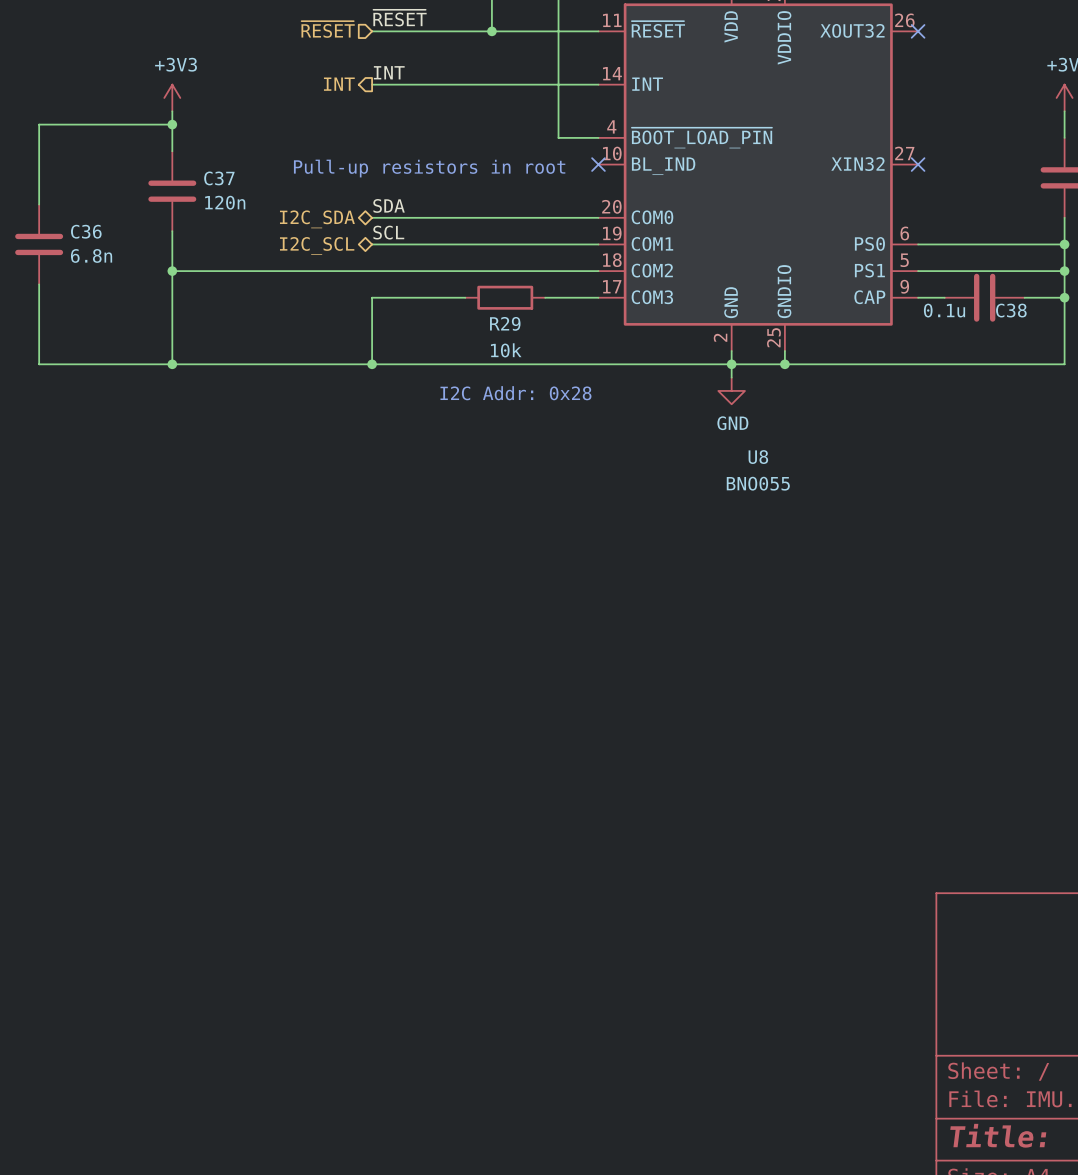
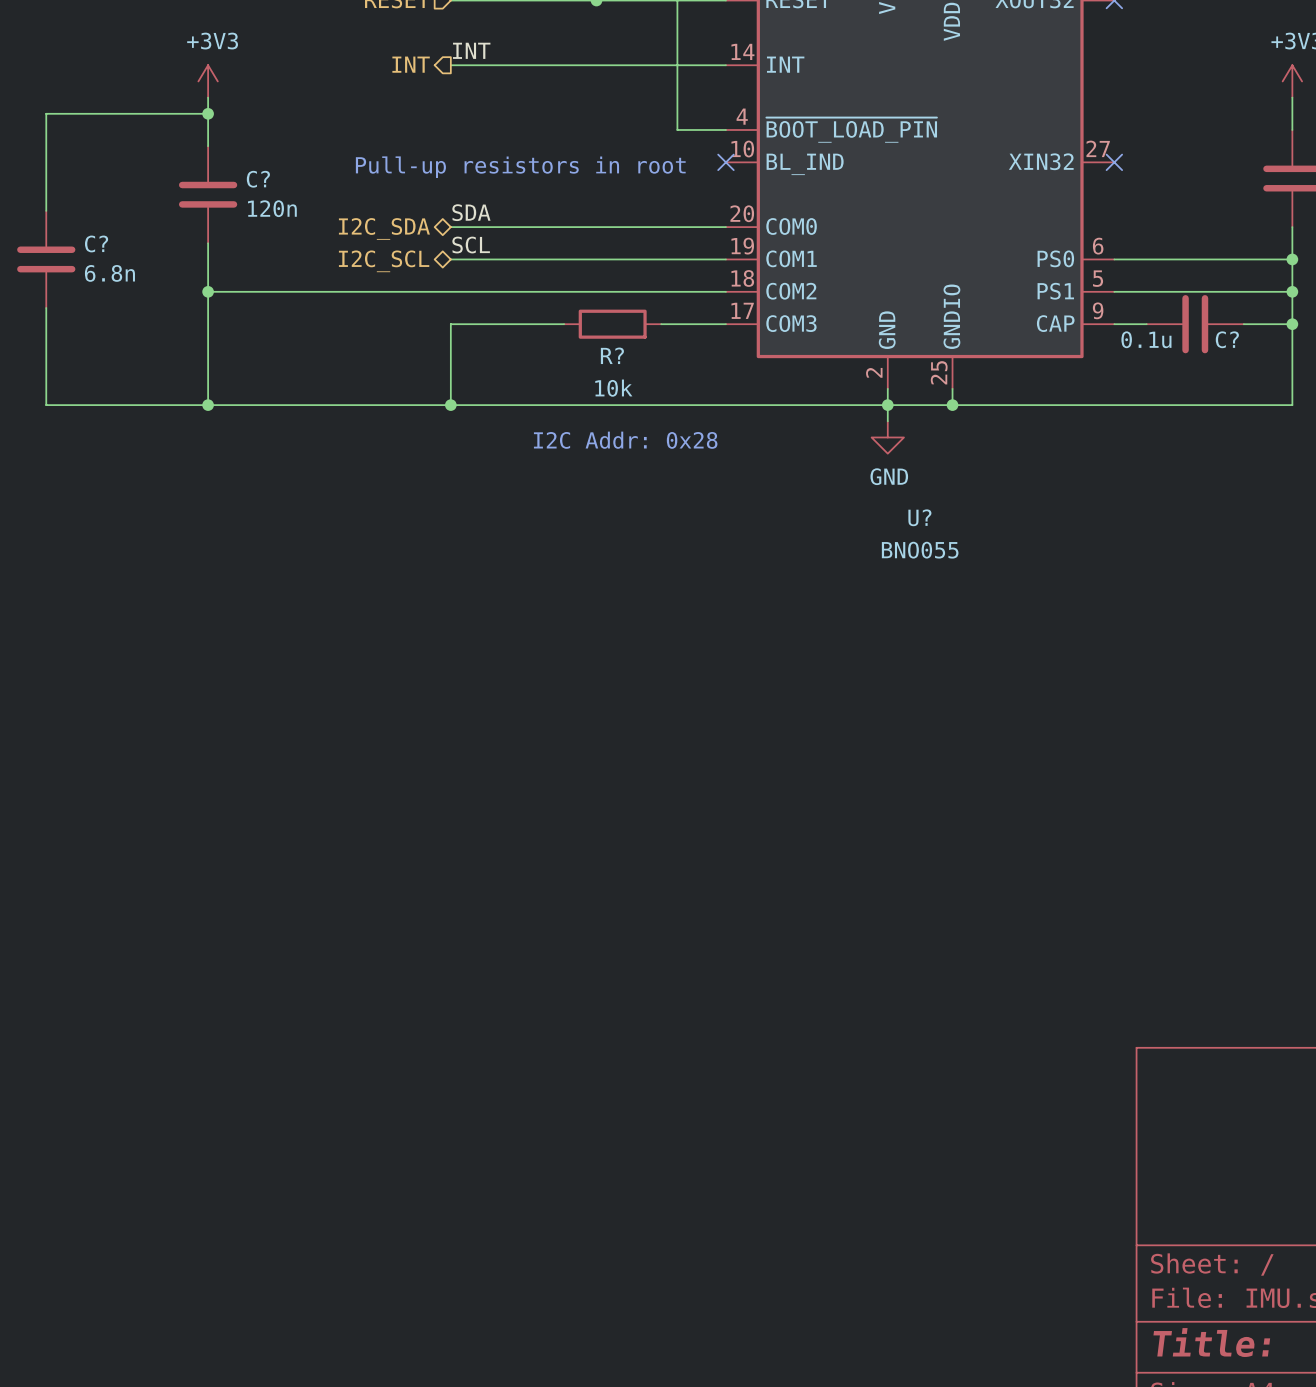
C37 name: C37 (219, 178) -> C? (258, 179)
C36 name: C36 (86, 231) -> C? (96, 243)
C38 name: C38 (1011, 310) -> C? (1227, 339)
R29 name: R29 (505, 323) -> R? (612, 355)
U8 name: U8 (758, 457) -> U? (919, 517)

